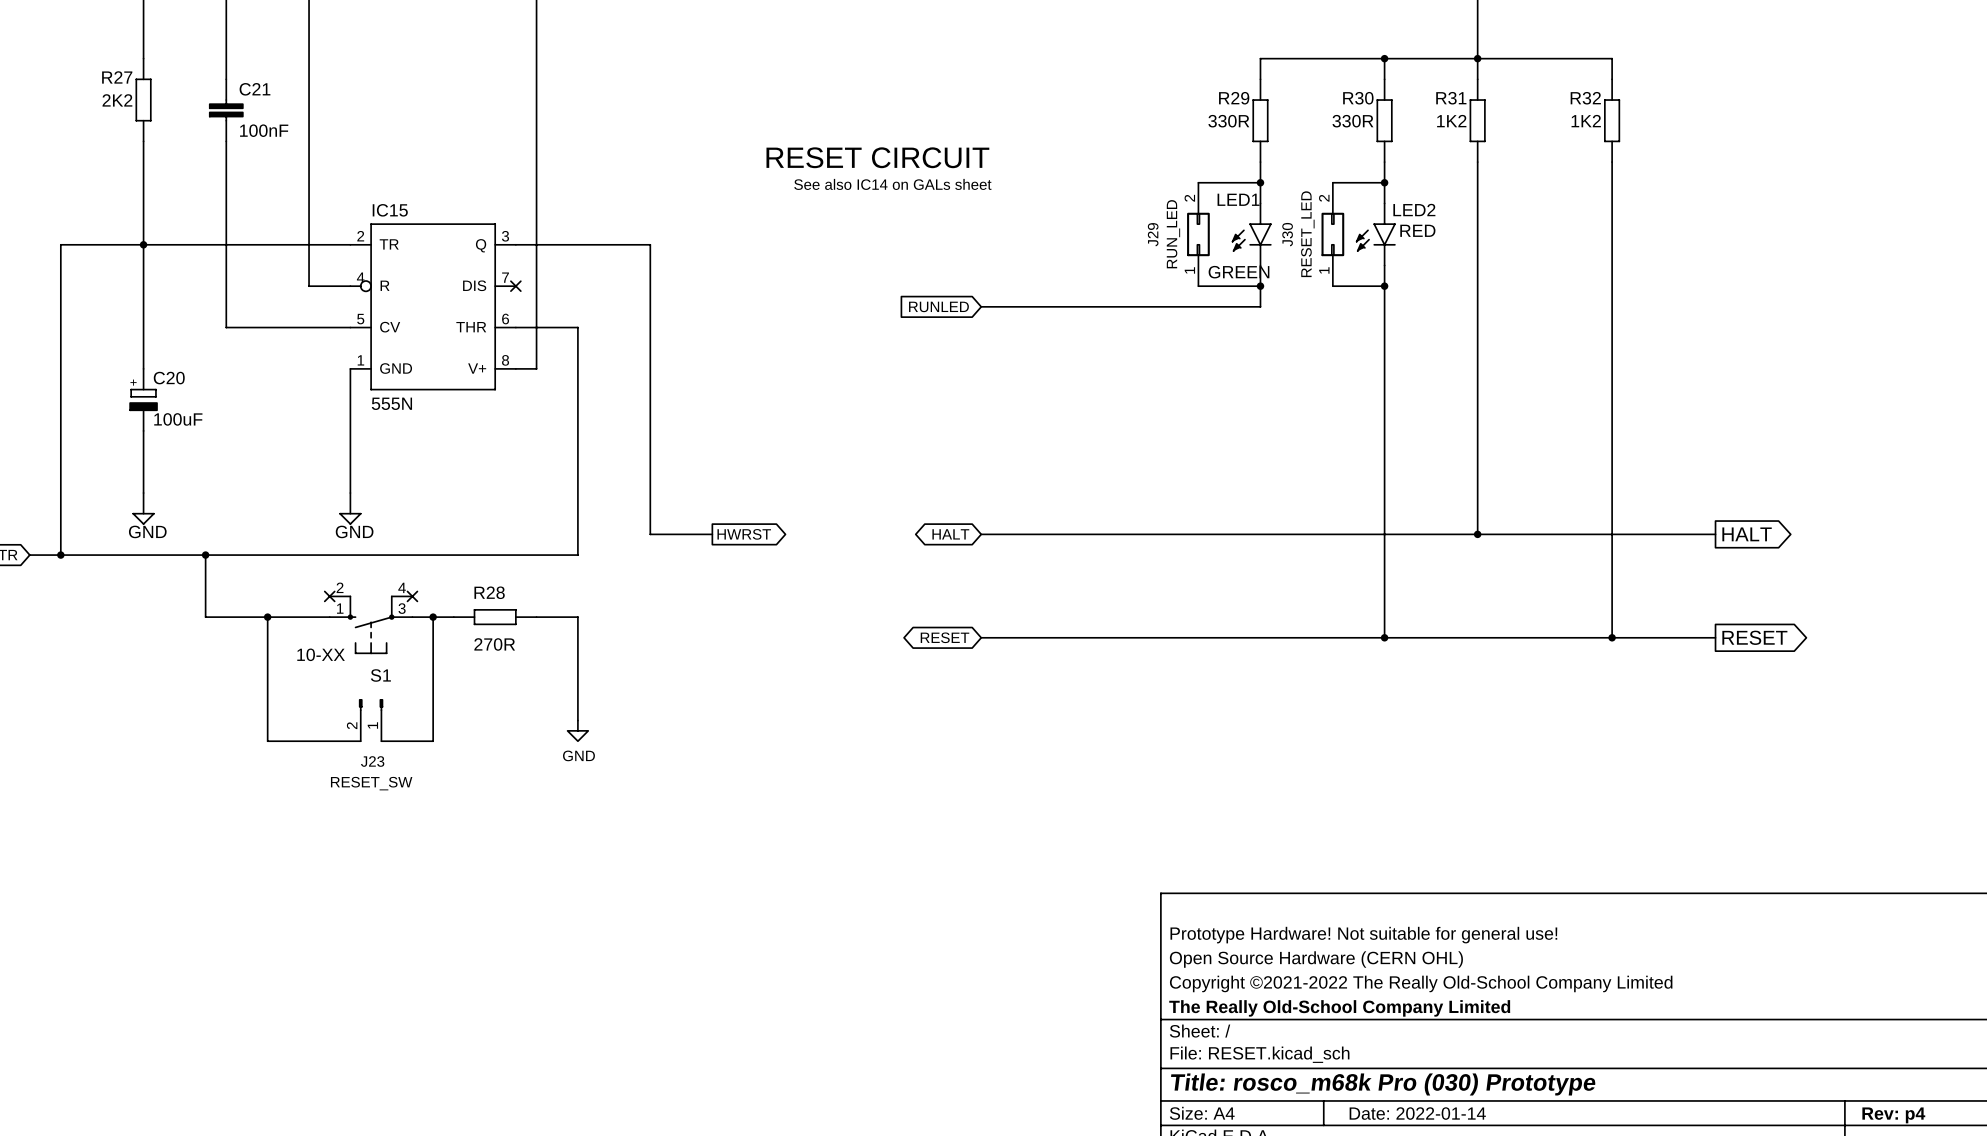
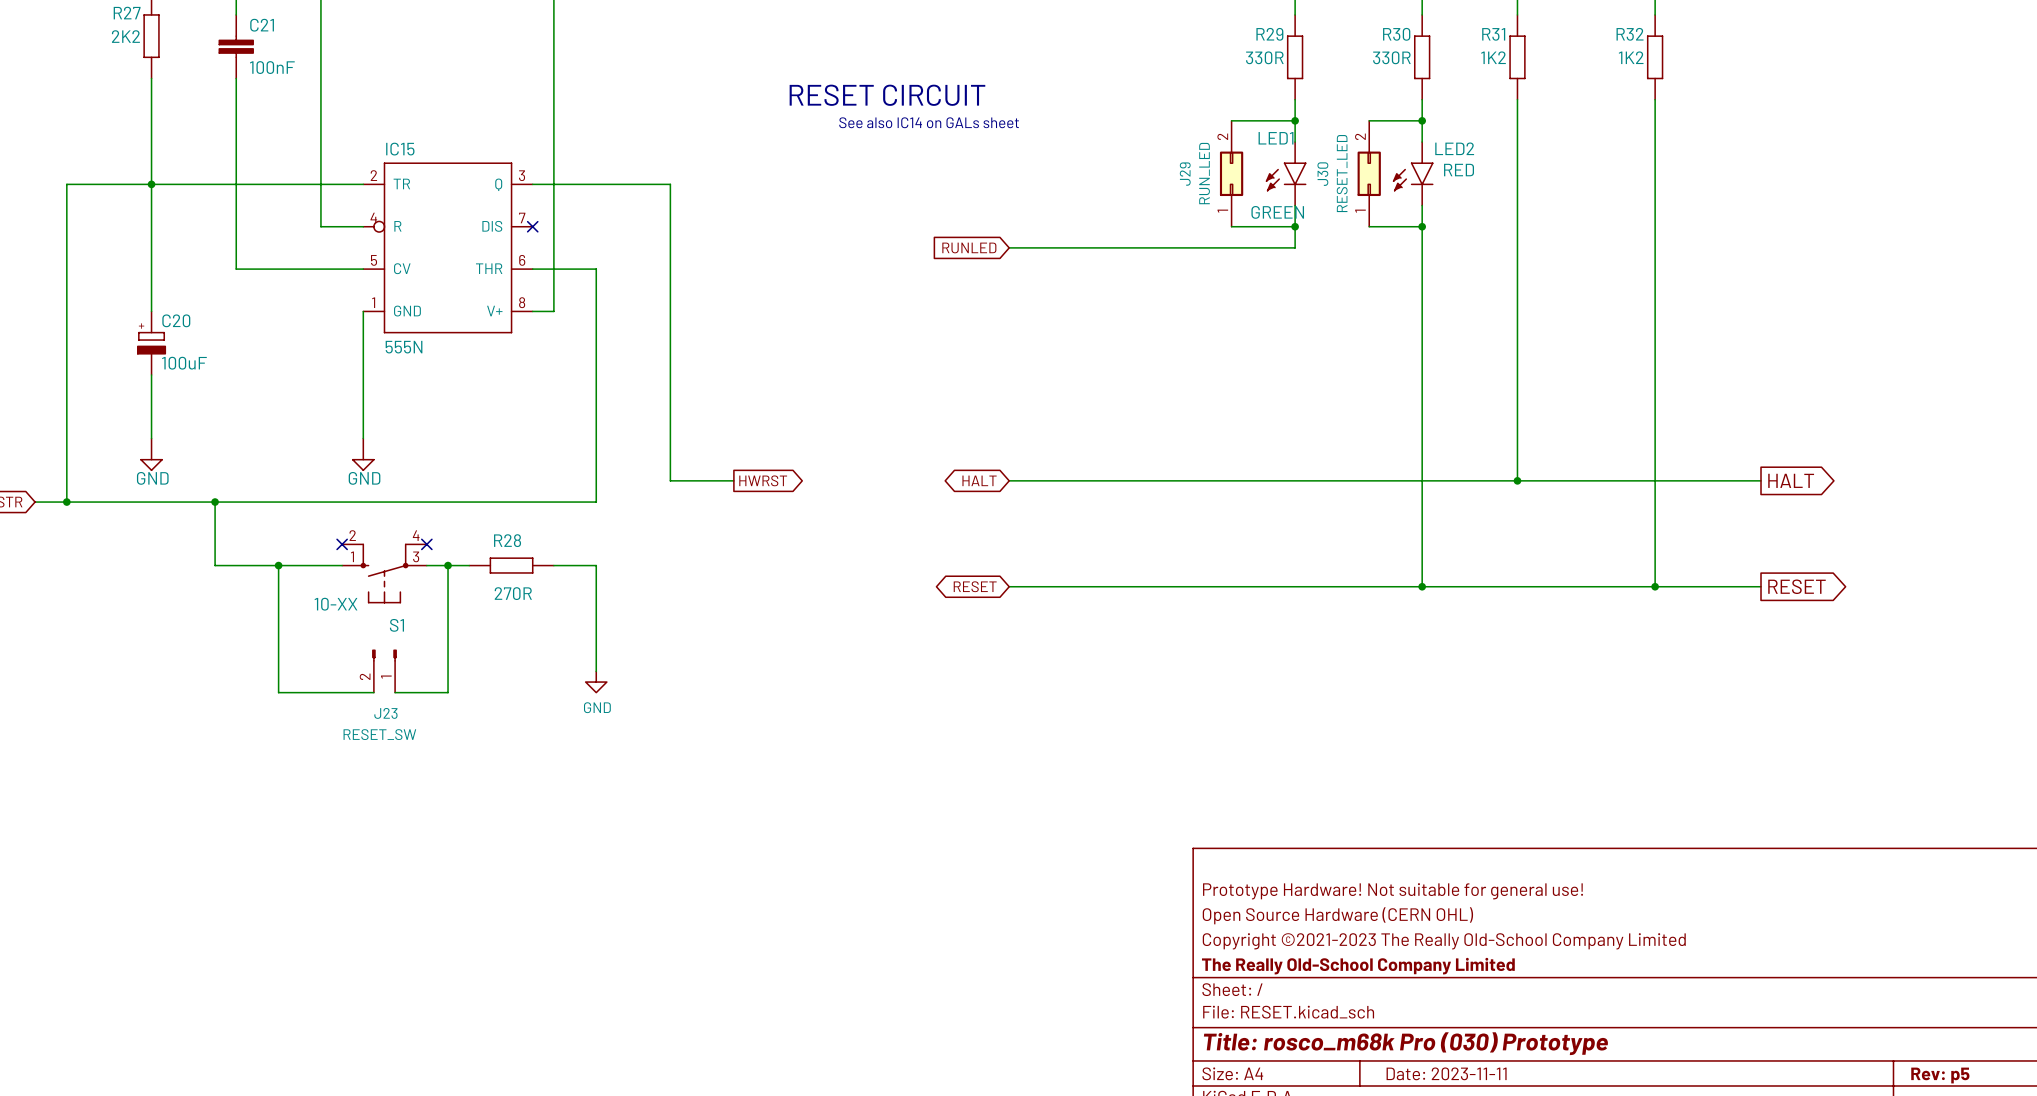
title block: Copyright ©2021-2022 The Really Old-School Company Limited (1421, 983) -> Copyright ©2021-2023 The Really Old-School Company Limited (1444, 941)
title block: Date: 2022-01-14 (1417, 1113) -> Date: 2023-11-11 (1446, 1073)
title block: Rev: p4 (1893, 1115) -> Rev: p5 (1940, 1075)

